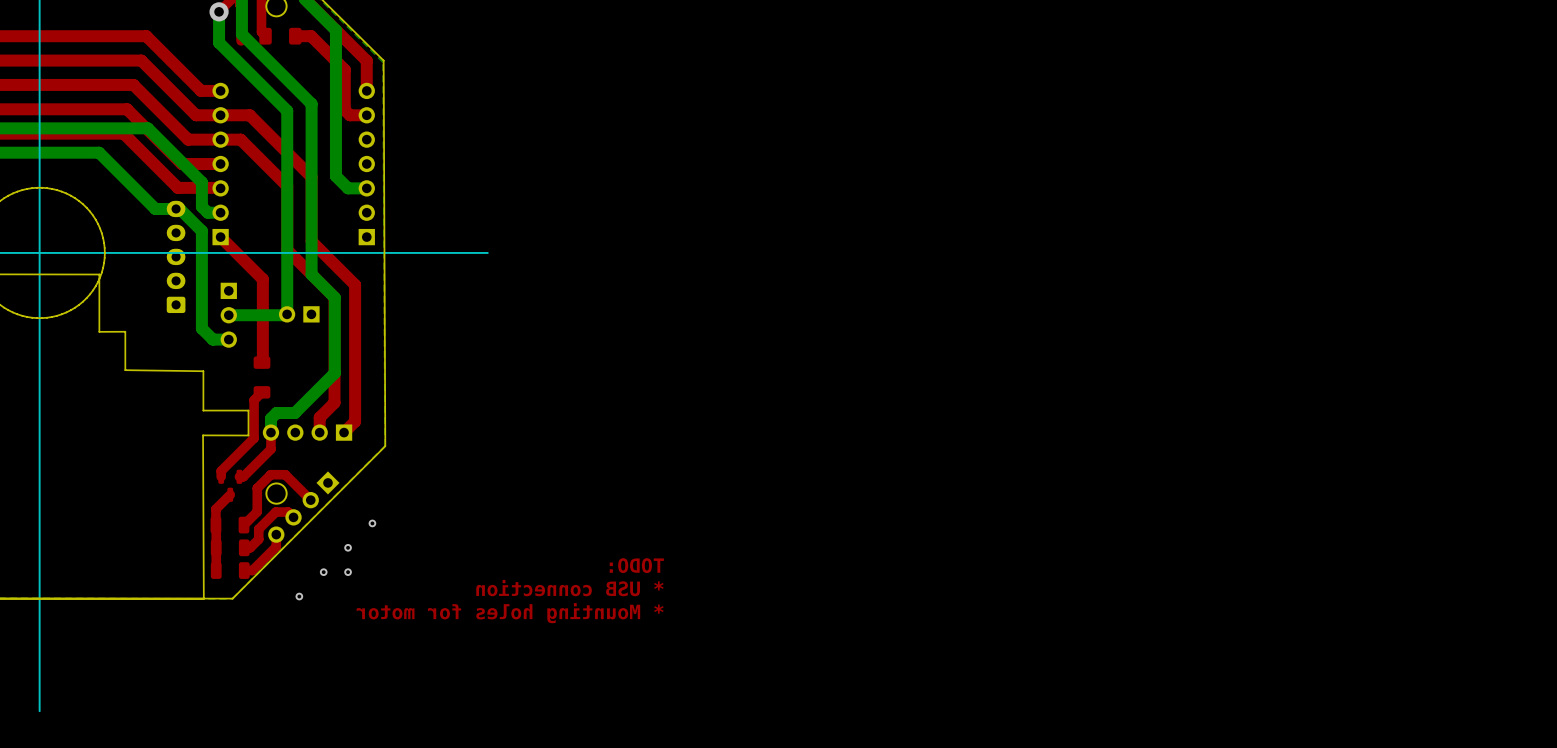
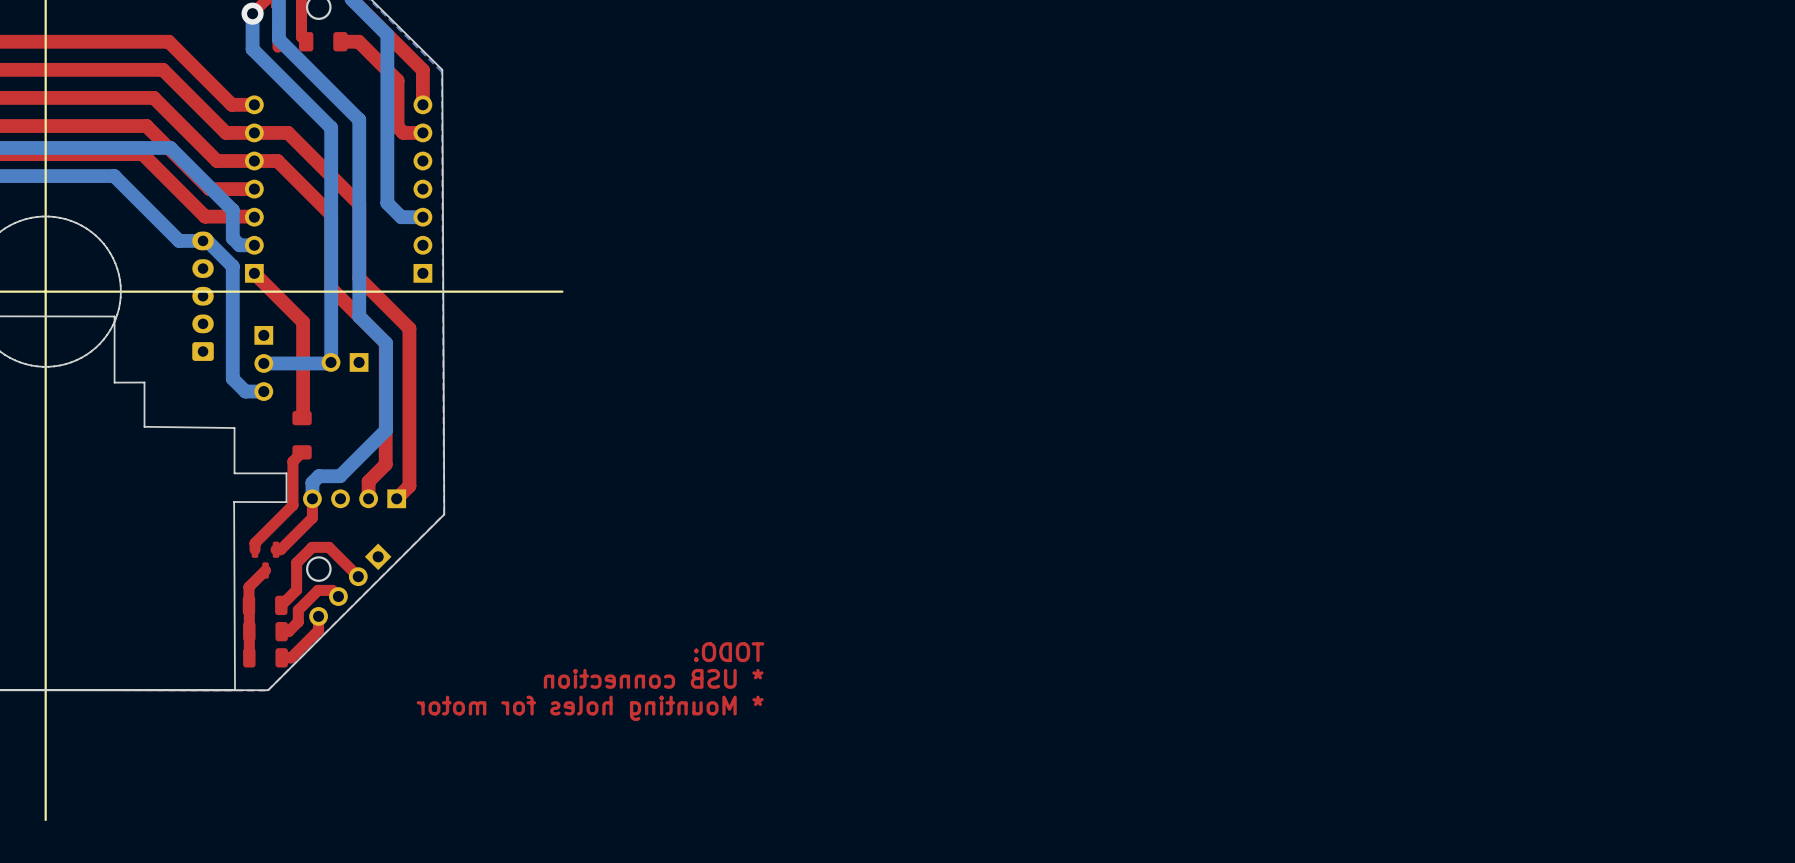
via: (372, 523) -> none
via: (348, 547) -> none
via: (323, 572) -> none
via: (348, 572) -> none
via: (299, 596) -> none

